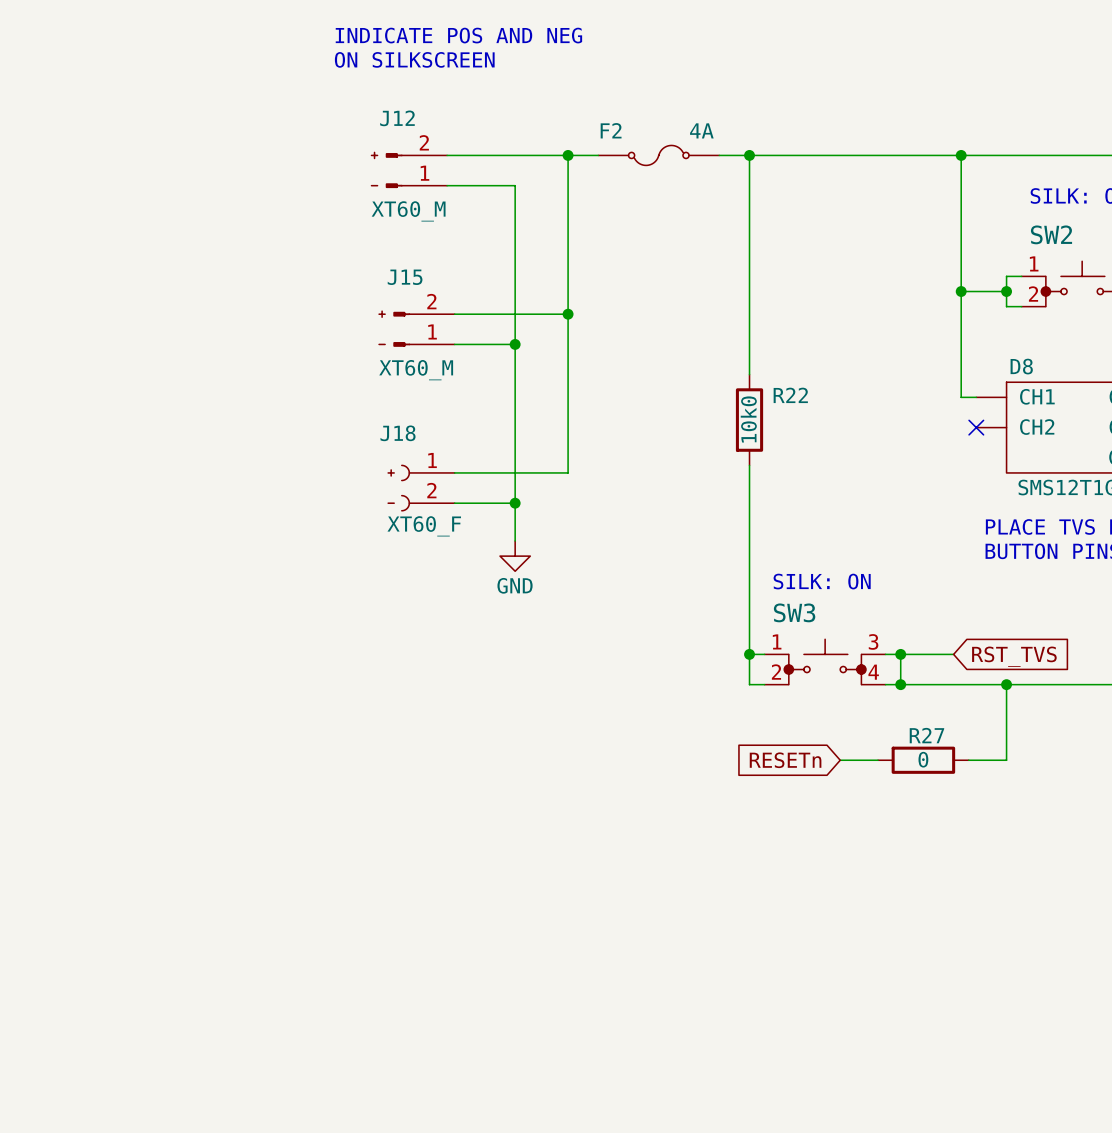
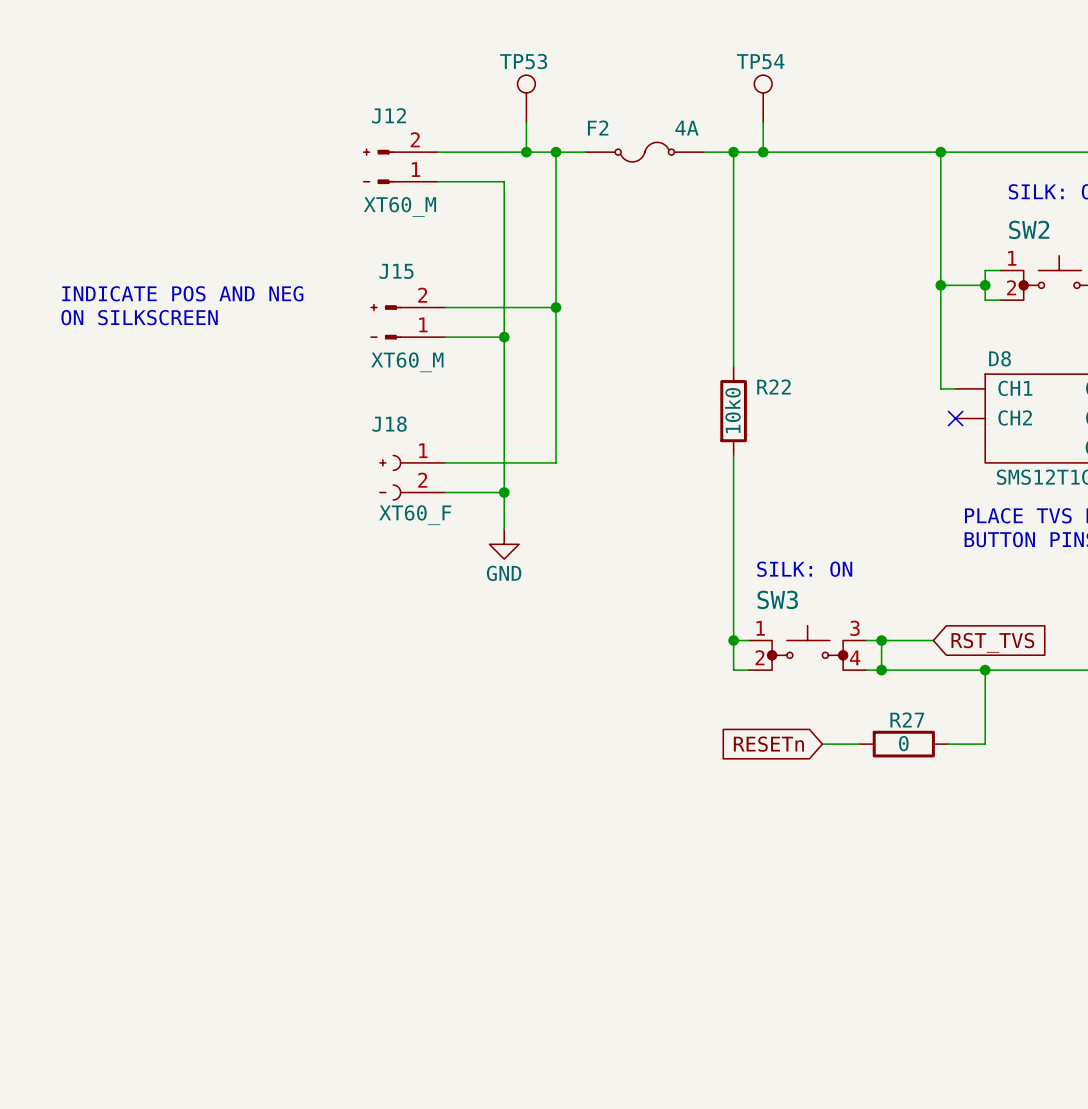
text: INDICATE POS AND NEG (458, 35) -> none
text: ON SILKSCREEN (414, 59) -> none
TP53: none -> (526, 98)
TP54: none -> (763, 98)
wire: none -> (526, 122) (526, 152)
wire: none -> (763, 122) (763, 152)
junction: none -> (526, 152)
junction: none -> (763, 152)
text: none -> INDICATE POS AND NEG (182, 293)
text: none -> ON SILKSCREEN (139, 317)

